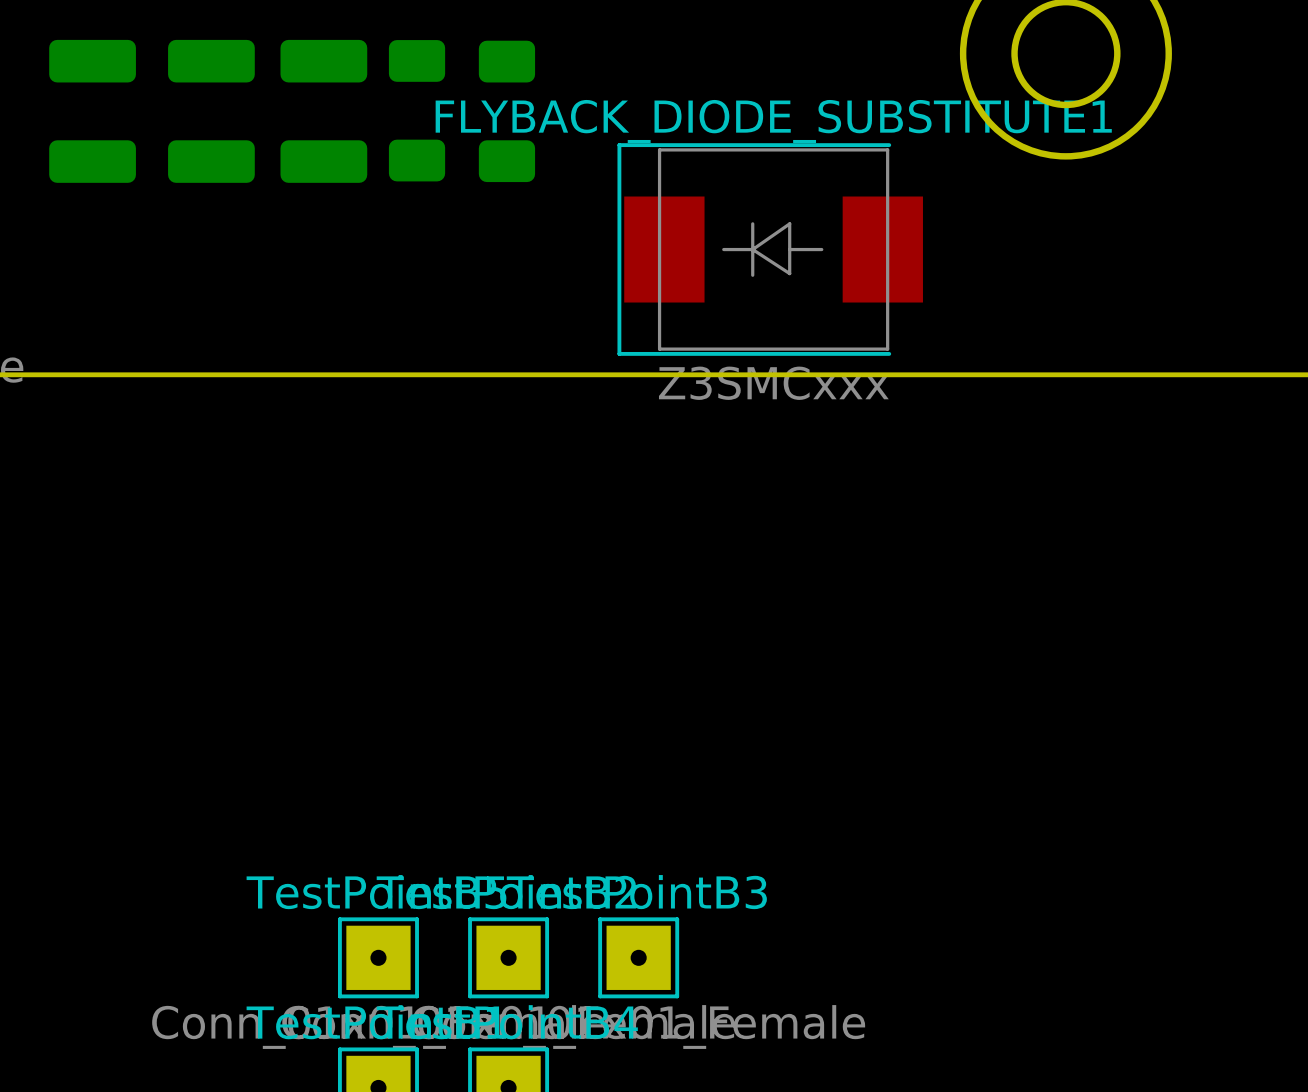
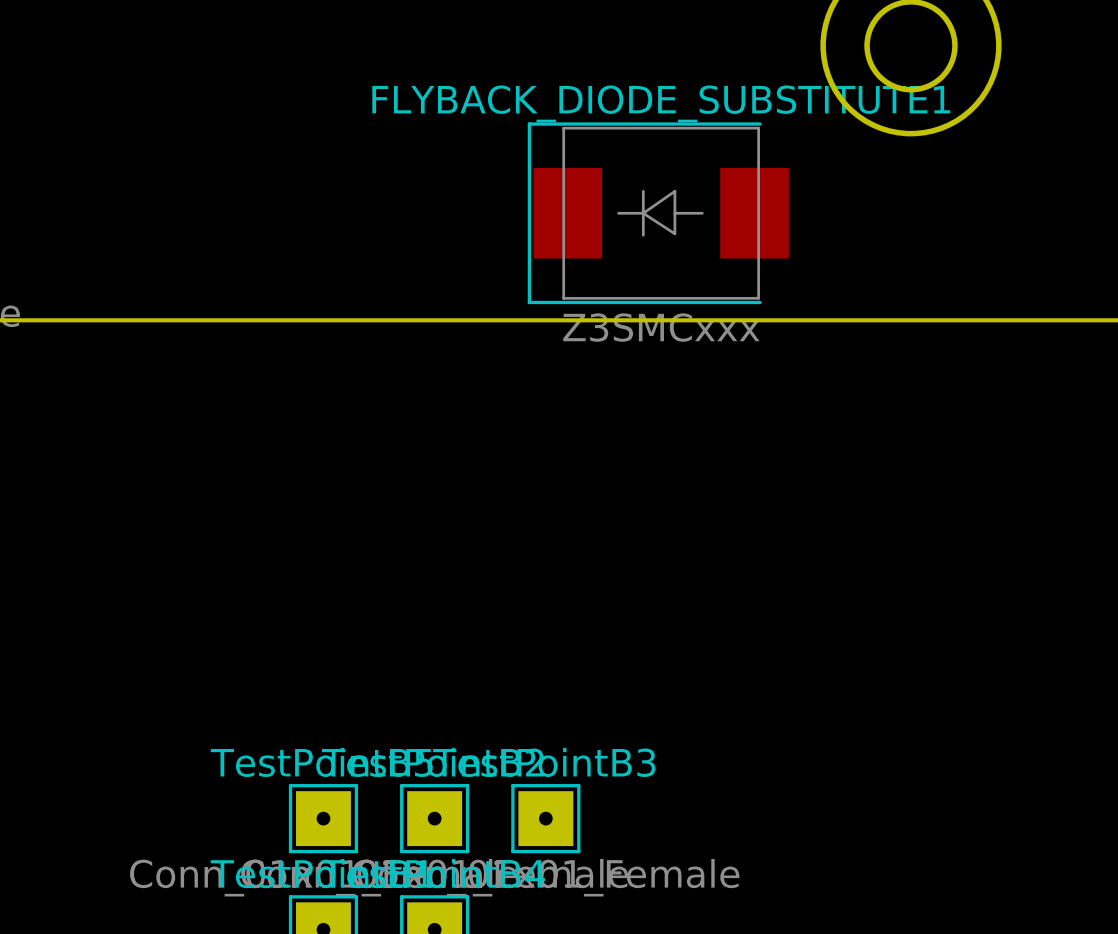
part: (417, 110) -> none
part: (92, 111) -> none
part: (211, 111) -> none
part: (323, 111) -> none
part: (506, 111) -> none

